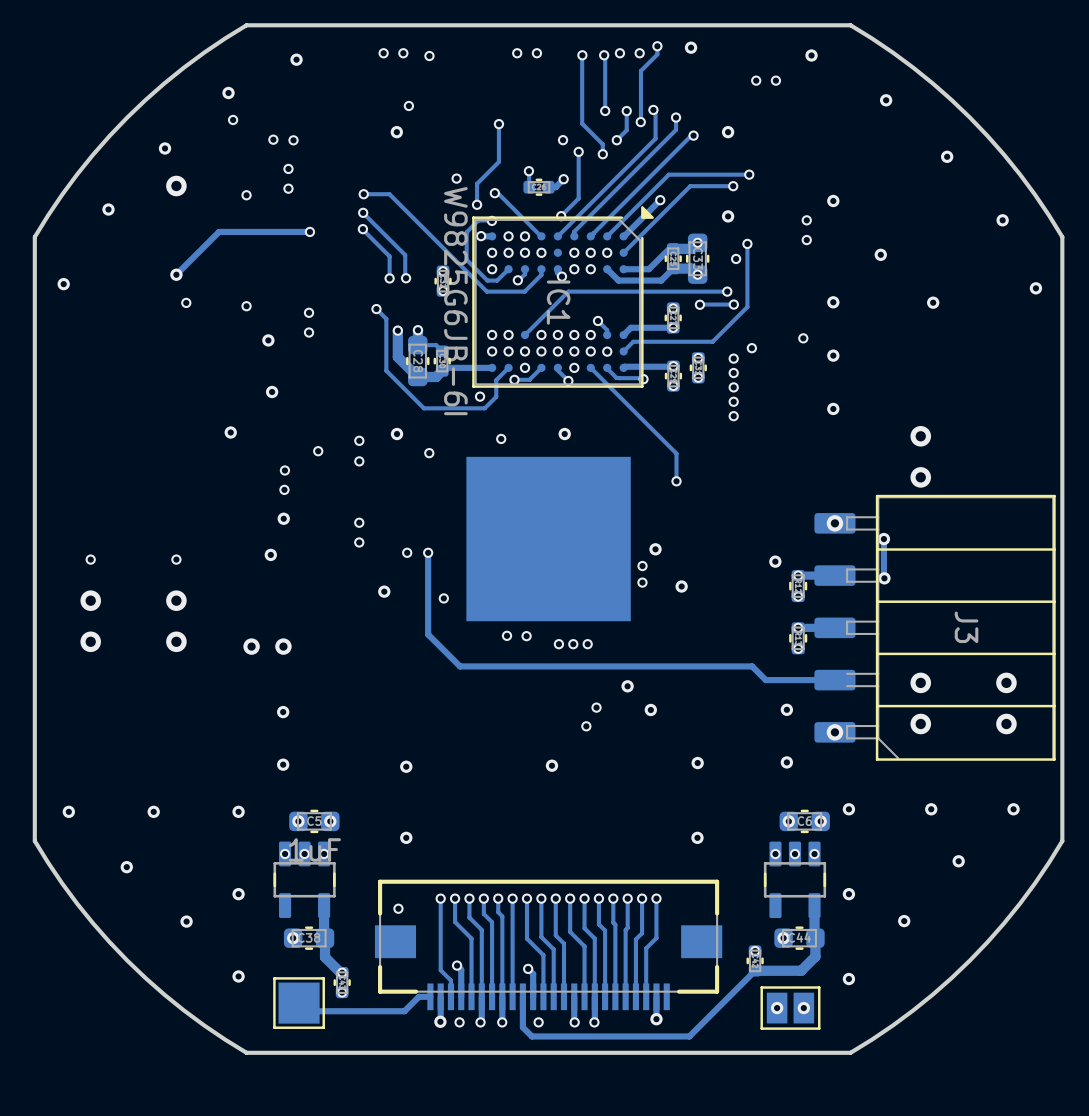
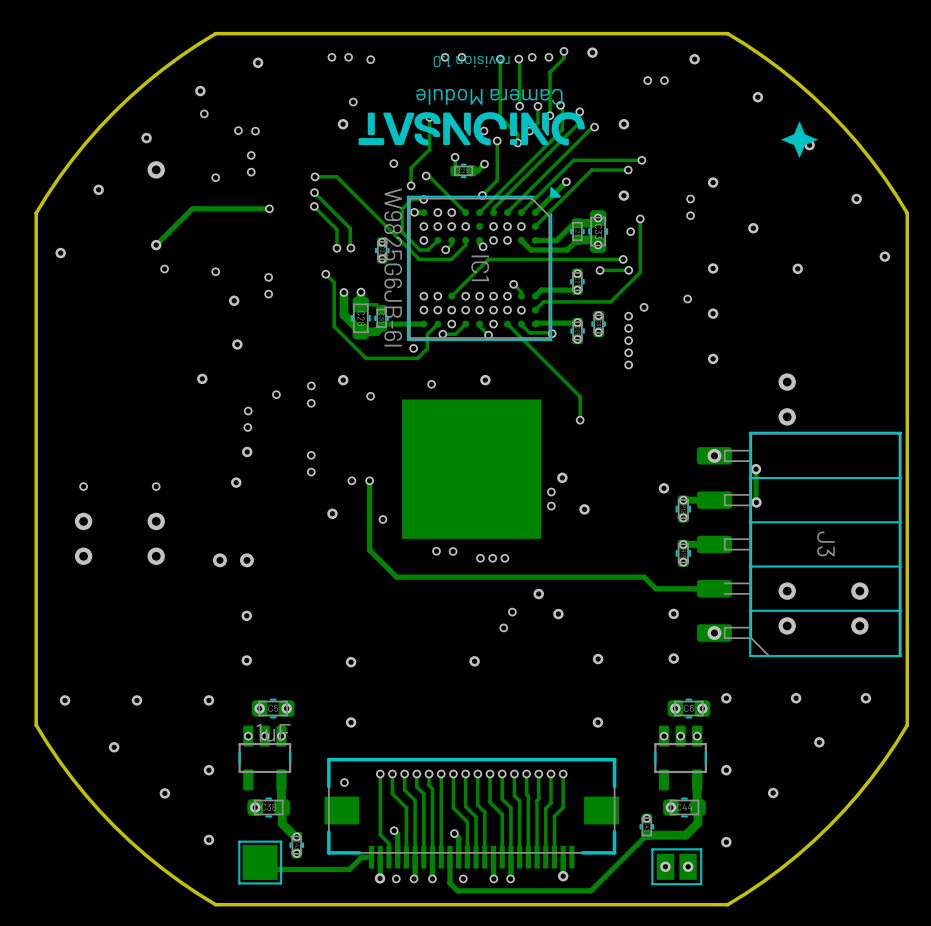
text: none -> revision 1.0 (471, 61)
text: none -> Camera Module (489, 96)
drawing: none -> [358, 112, 585, 146]
drawing: none -> [781, 121, 818, 158]

